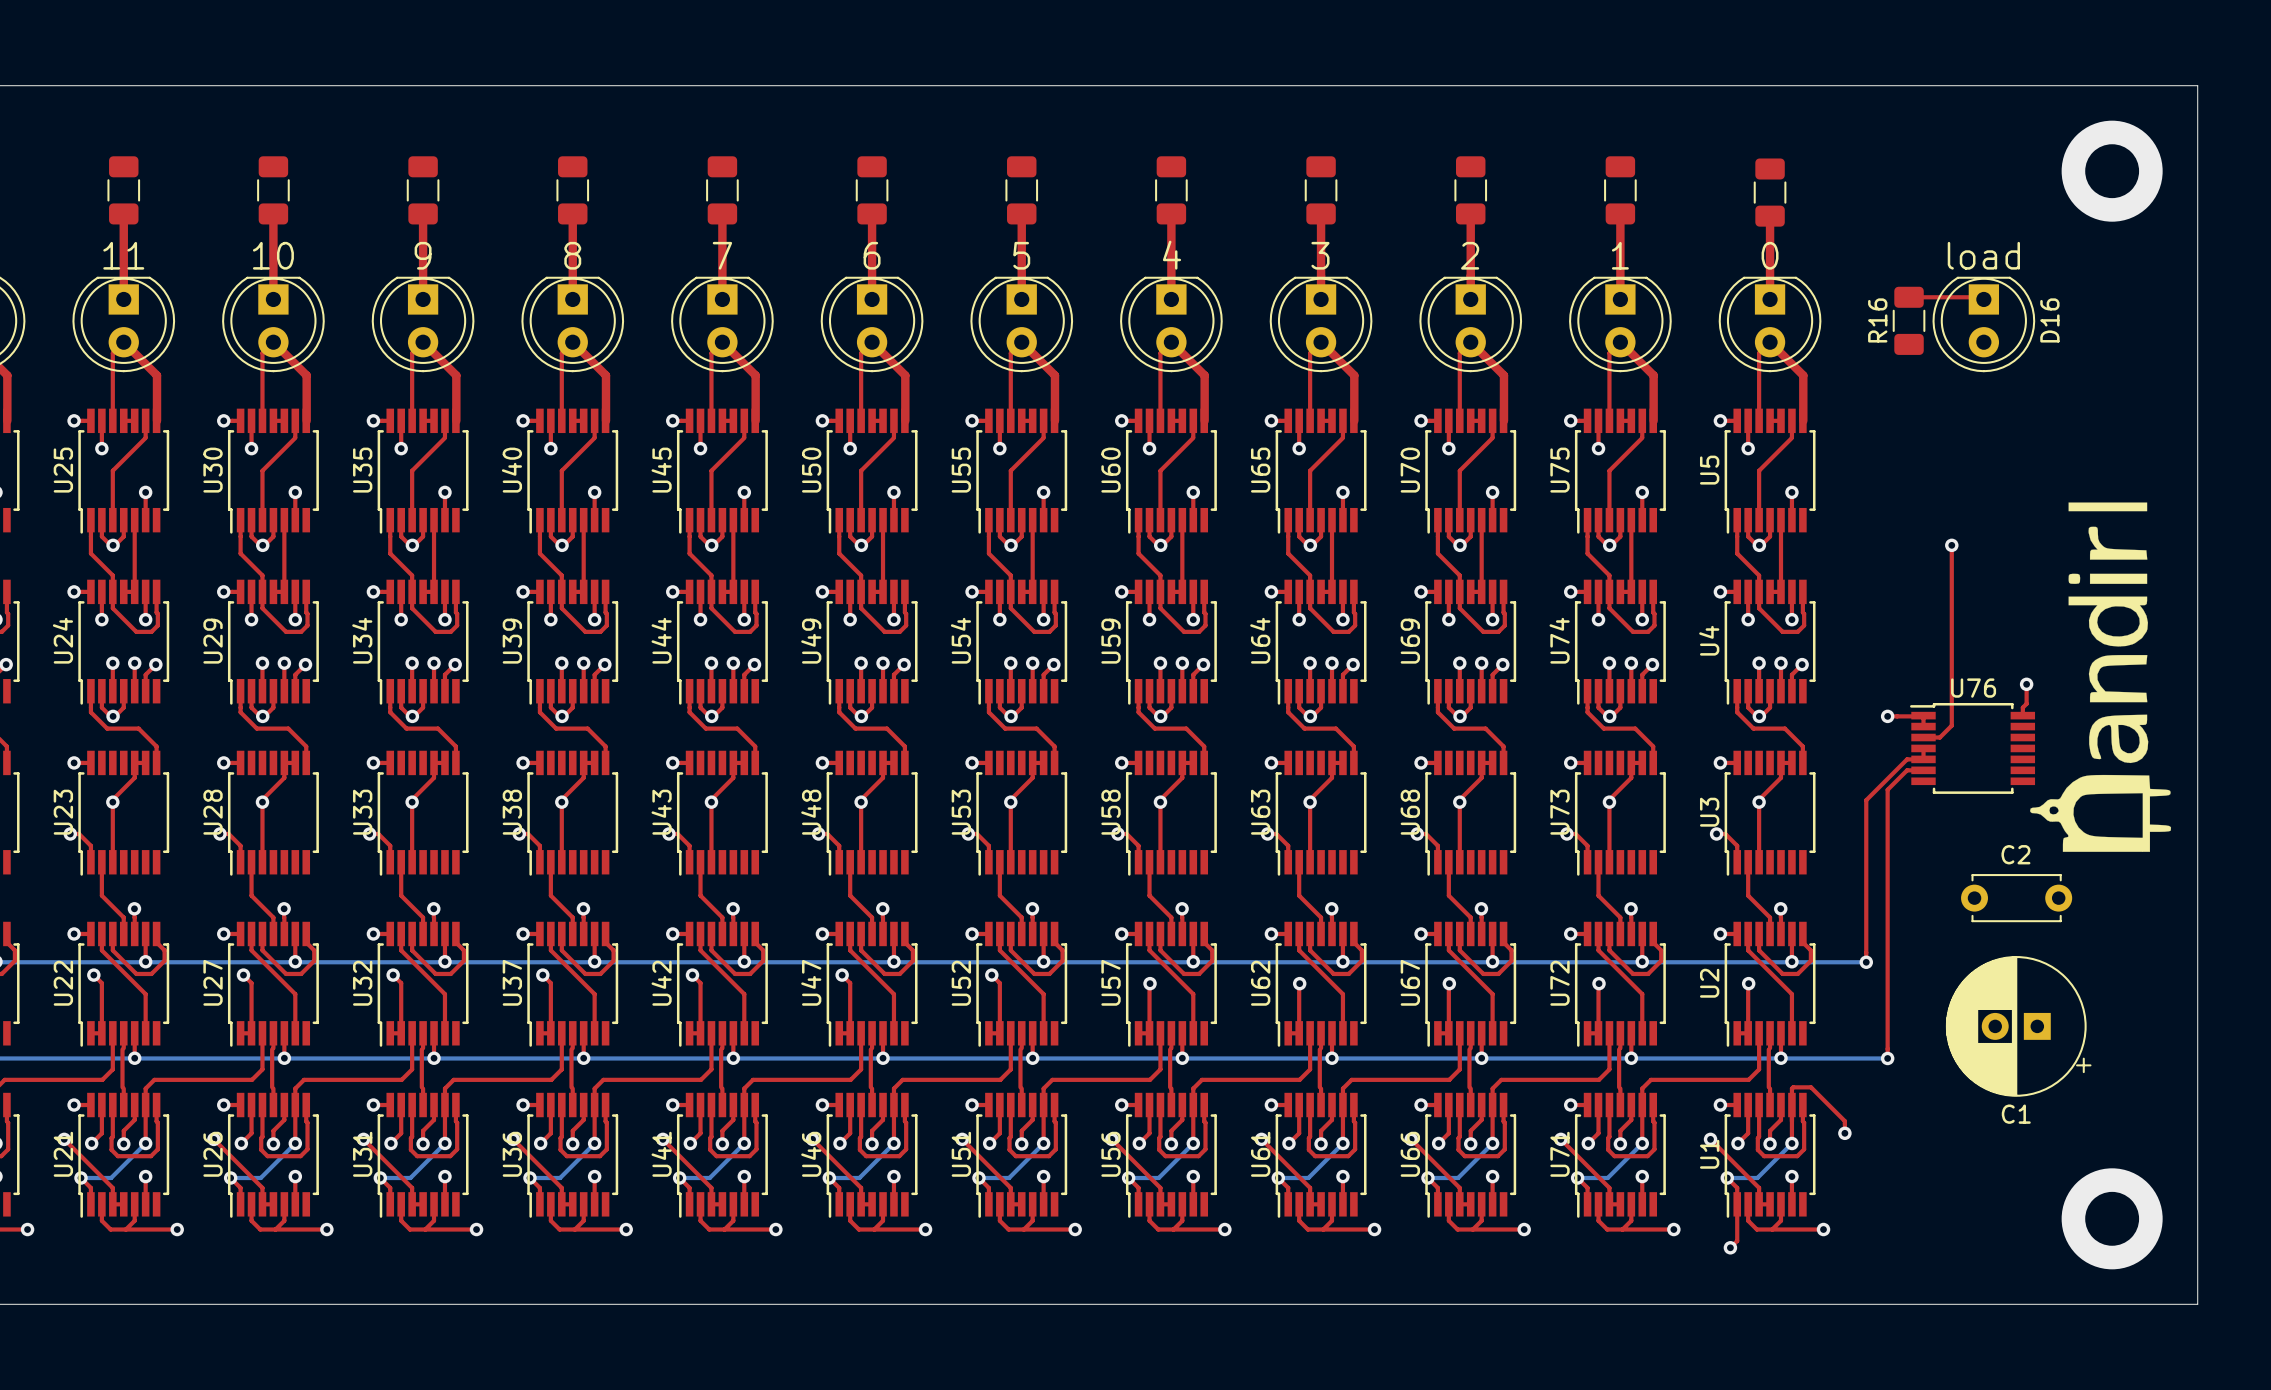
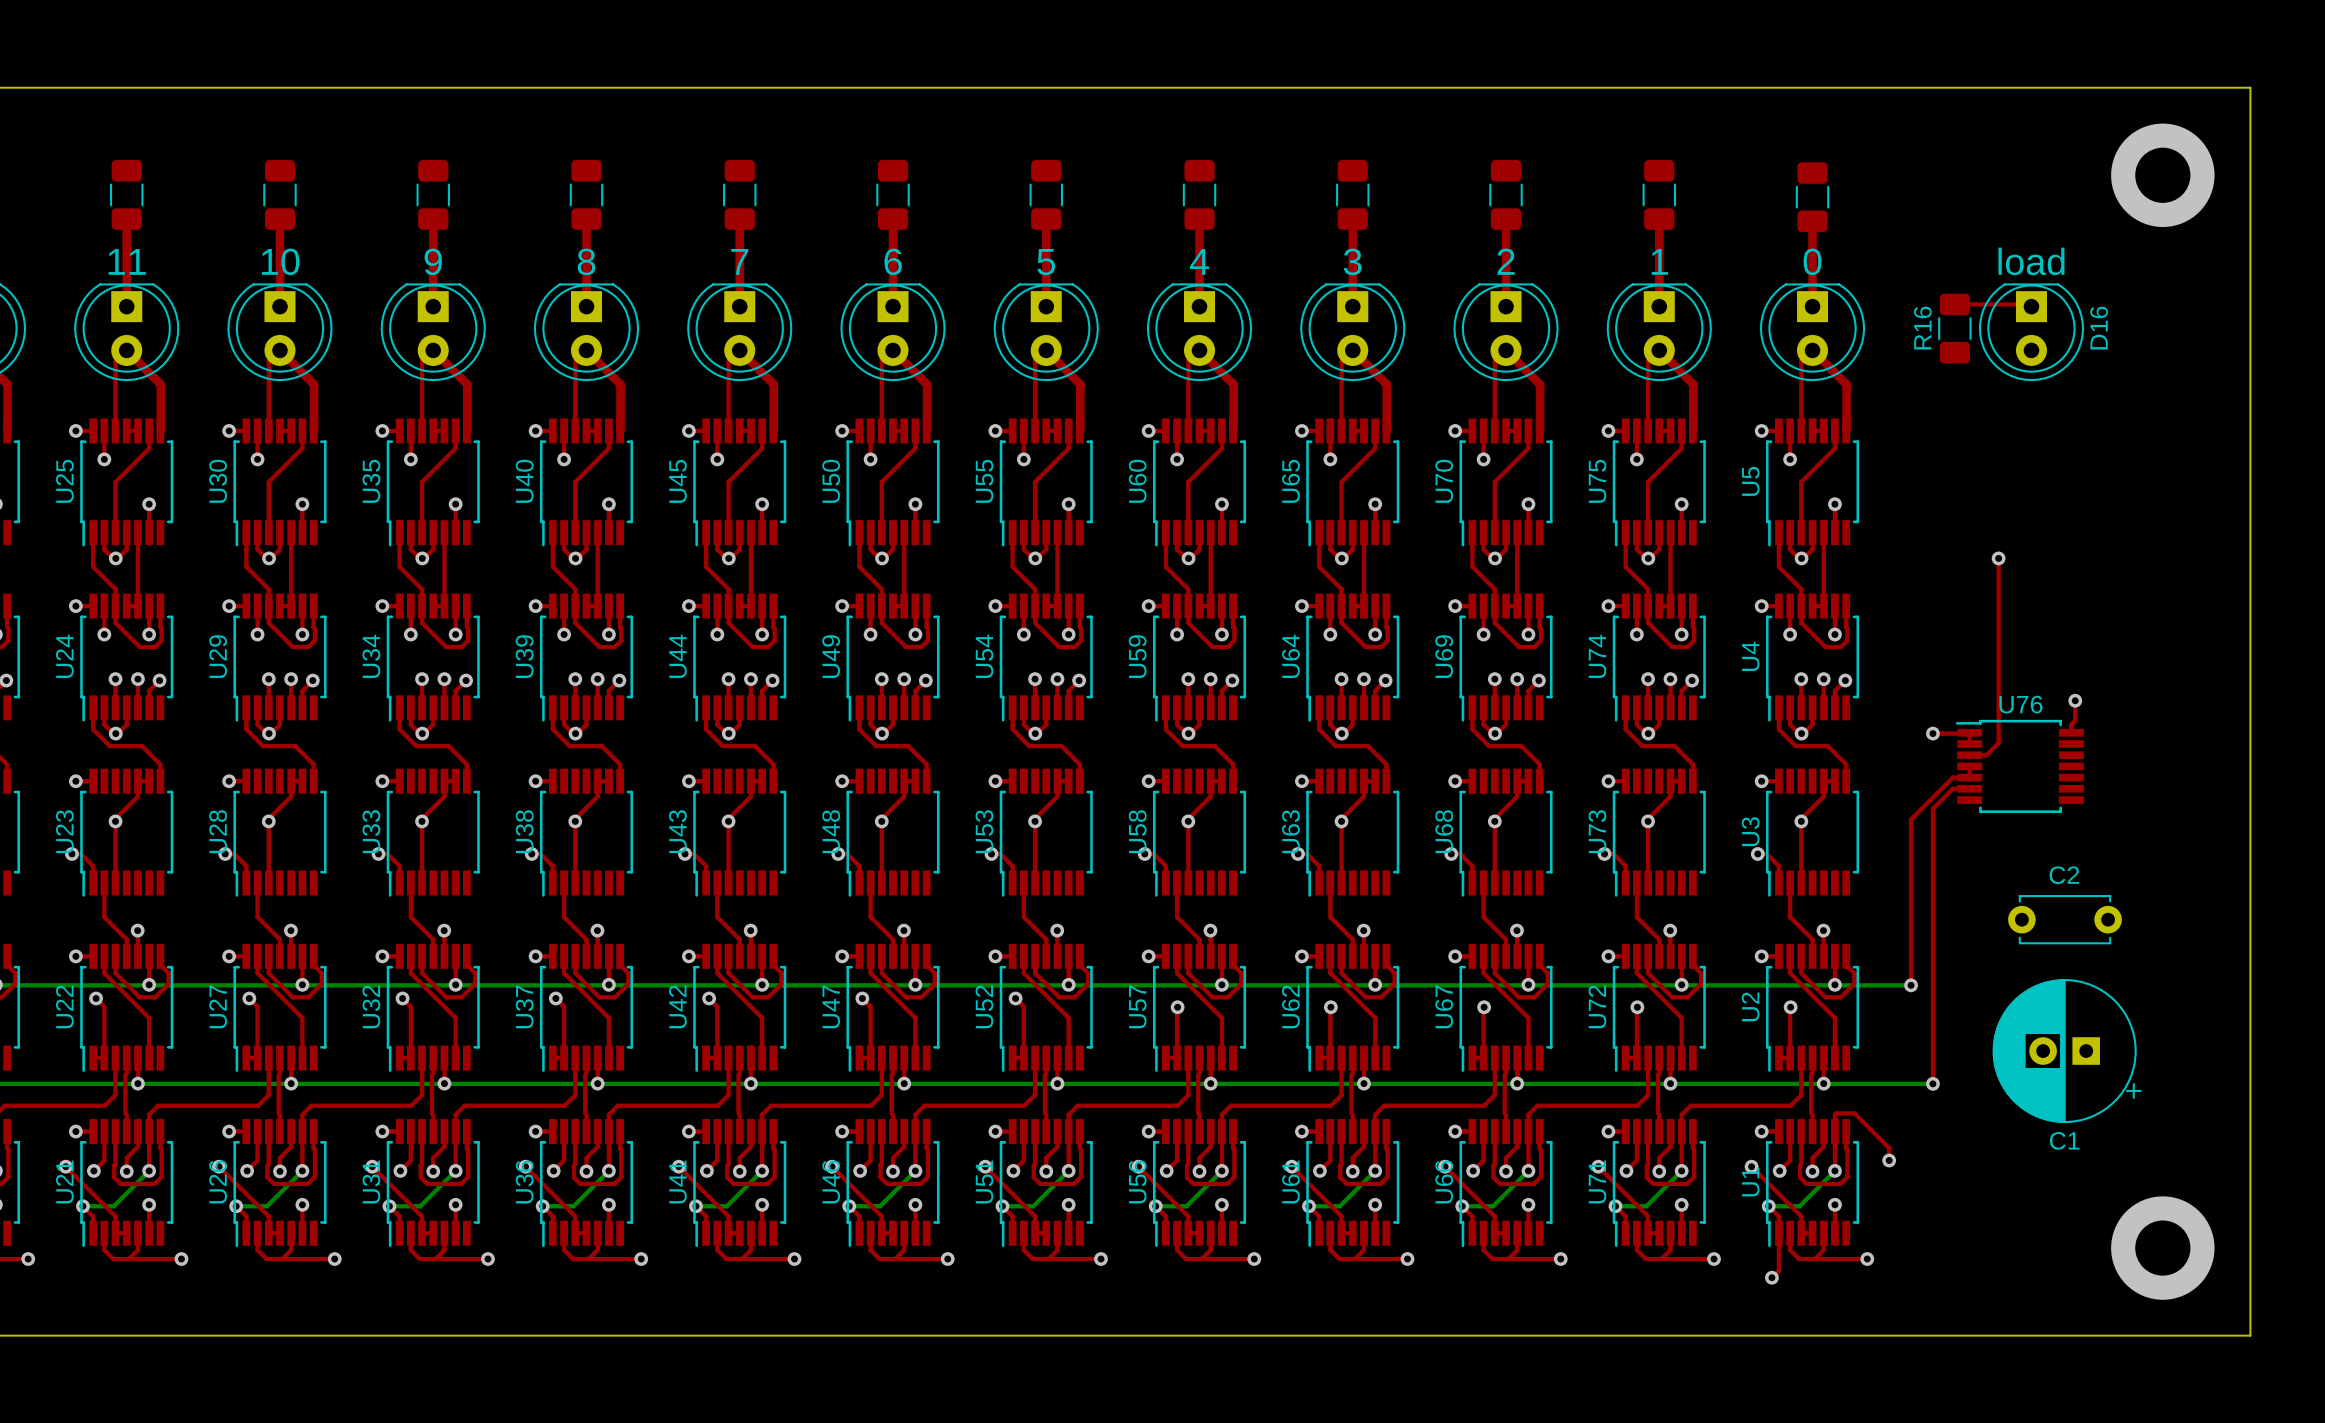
drawing: [2030, 502, 2172, 852] -> none

